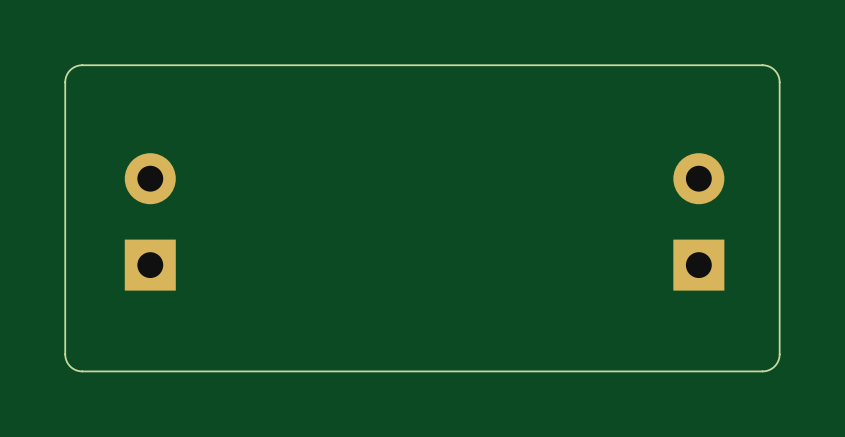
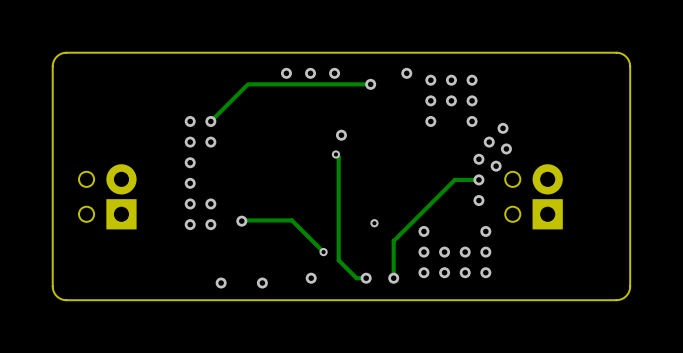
via: none -> (286, 73)
via: none -> (310, 73)
via: none -> (334, 73)
via: none -> (406, 73)
via: none -> (430, 80)
via: none -> (451, 80)
via: none -> (472, 80)
track: none -> (370, 84) (247, 84)
via: none -> (370, 84)
track: none -> (246, 85) (210, 121)
via: none -> (430, 100)
via: none -> (451, 100)
via: none -> (472, 100)
via: none -> (190, 121)
via: none -> (210, 121)
via: none -> (430, 121)
via: none -> (472, 121)
via: none -> (503, 128)
via: none -> (341, 135)
via: none -> (190, 142)
via: none -> (210, 142)
via: none -> (489, 142)
via: none -> (506, 148)
track: none -> (335, 154) (338, 157) (338, 260) (356, 278) (366, 278)
via: none -> (335, 154)
via: none -> (478, 159)
via: none -> (190, 162)
via: none -> (496, 166)
track: none -> (478, 176) (475, 179) (454, 179) (393, 241) (393, 278)
part: (150, 221) -> none
part: (698, 221) -> none
via: none -> (478, 179)
via: none -> (190, 183)
part: none -> (107, 196)
part: none -> (534, 196)
via: none -> (478, 200)
via: none -> (190, 203)
via: none -> (210, 203)
track: none -> (241, 221) (291, 220) (323, 252)
via: none -> (241, 221)
via: none -> (374, 223)
via: none -> (190, 224)
via: none -> (210, 224)
via: none -> (423, 231)
via: none -> (485, 231)
via: none -> (323, 252)
via: none -> (423, 252)
via: none -> (444, 252)
via: none -> (465, 252)
via: none -> (485, 252)
via: none -> (423, 272)
via: none -> (444, 272)
via: none -> (465, 272)
via: none -> (485, 272)
via: none -> (311, 278)
via: none -> (366, 278)
via: none -> (393, 278)
via: none -> (221, 283)
via: none -> (262, 283)

